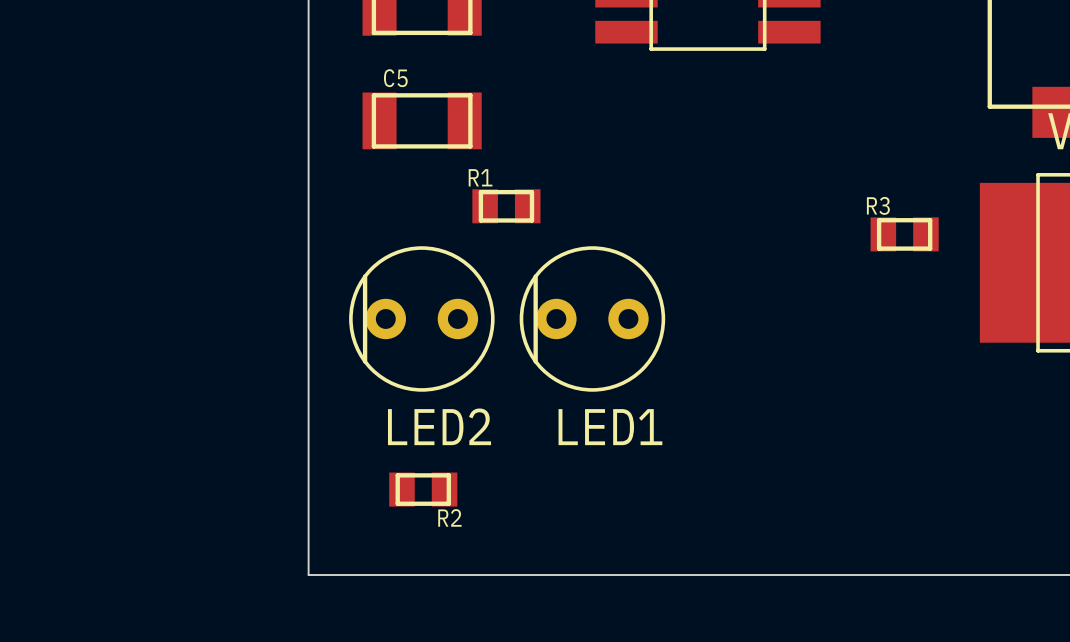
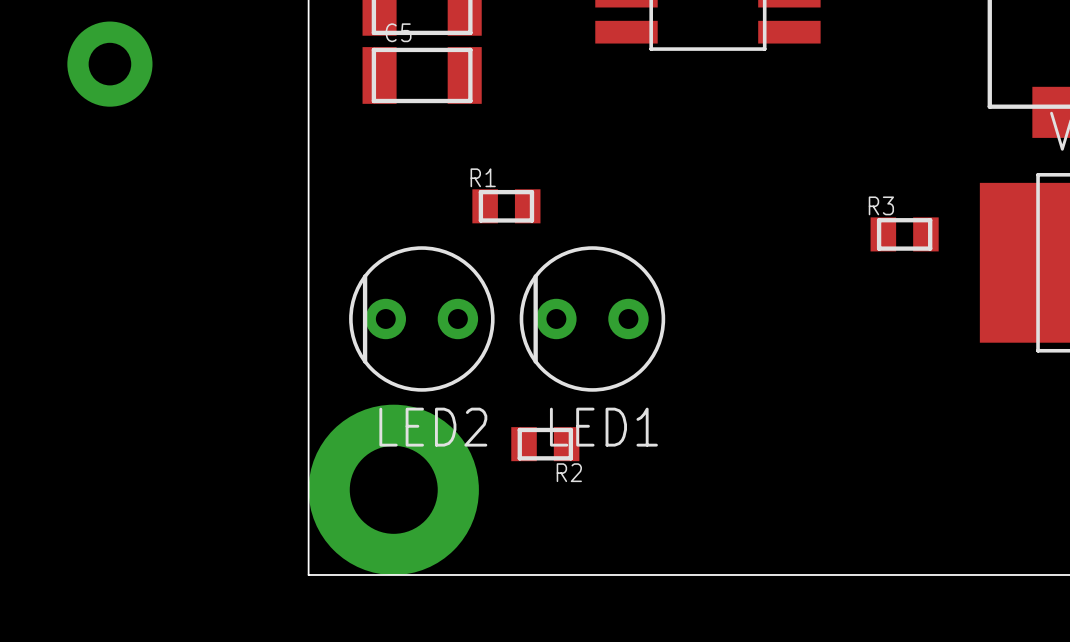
via: none -> (109, 64)
C5 position: (422, 120) -> (422, 75)
via: none -> (393, 489)
R2 position: (423, 489) -> (545, 444)

